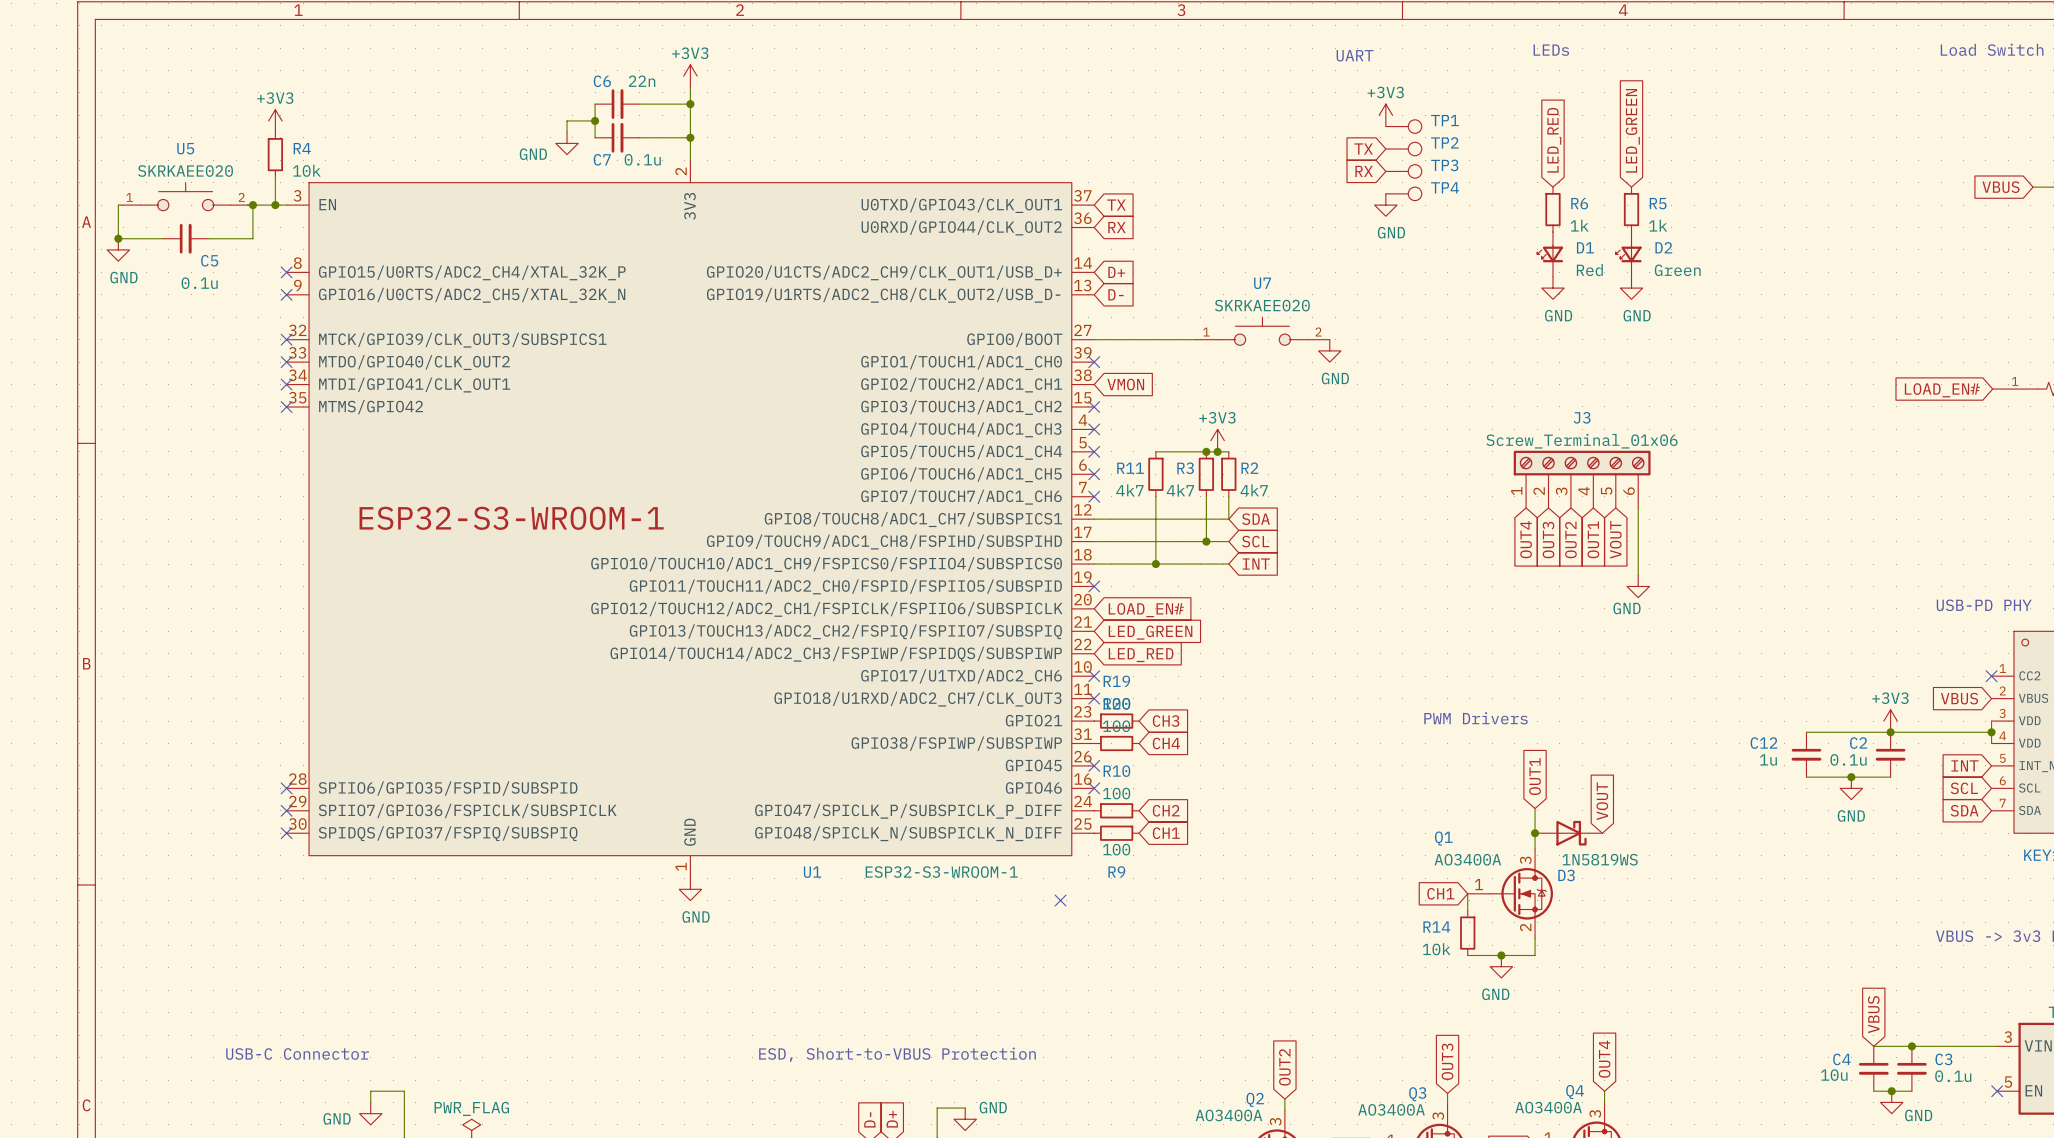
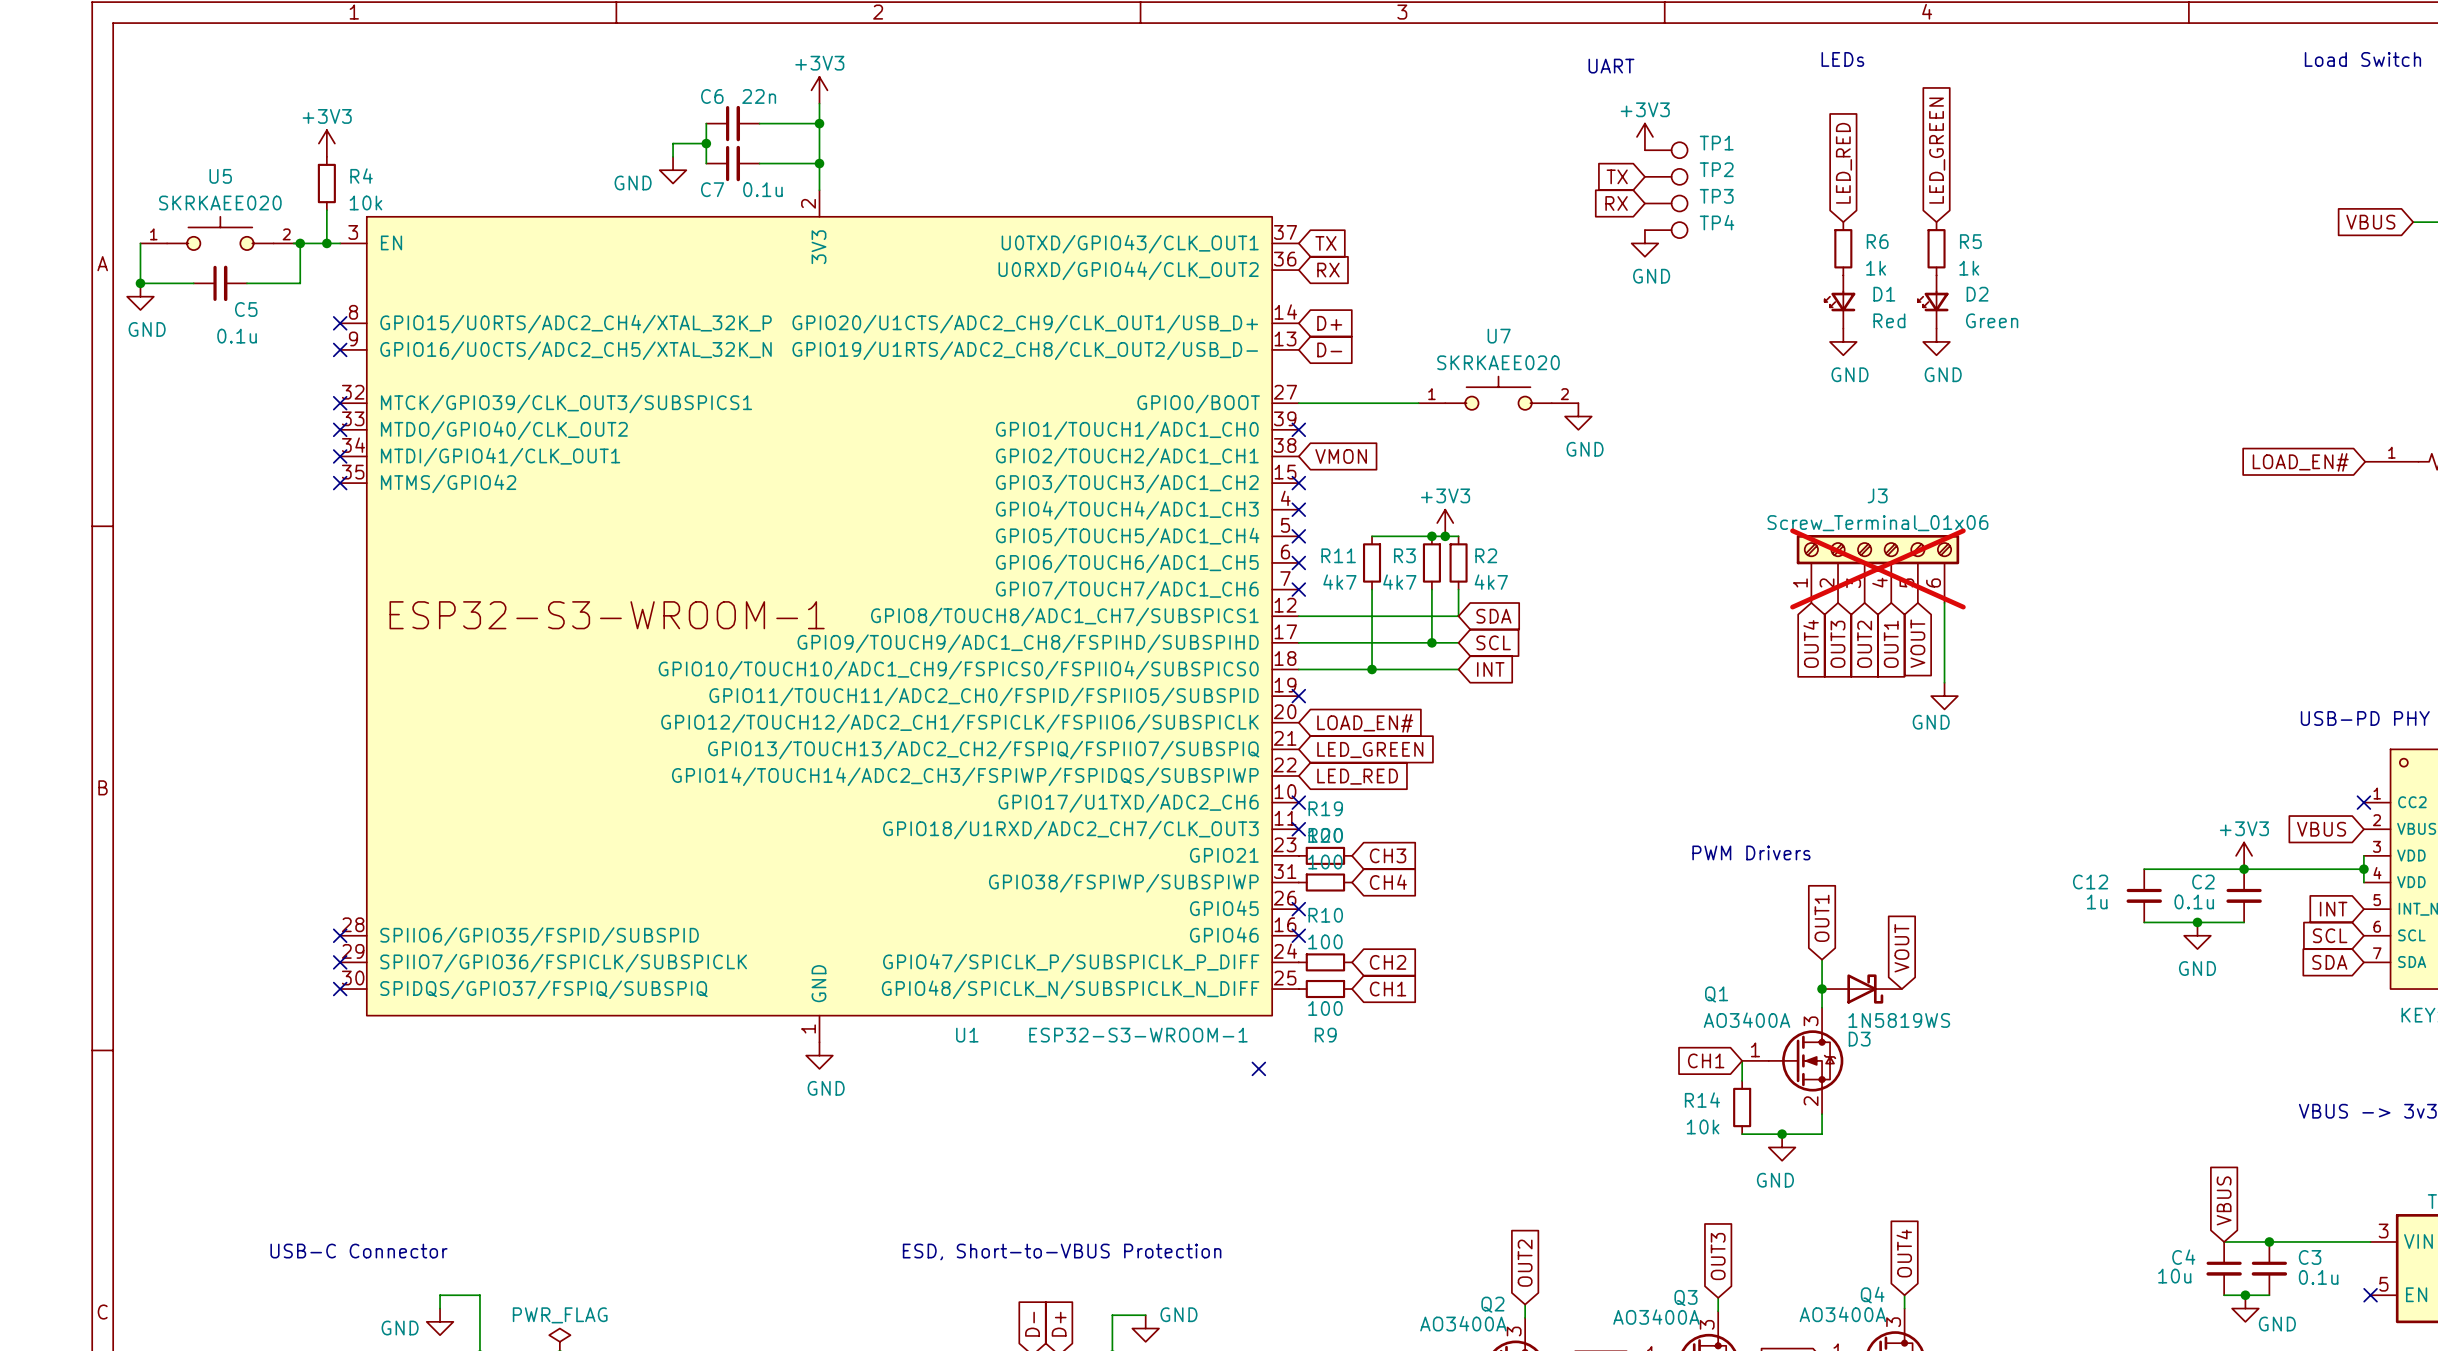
J3 do-not-place cross: none -> (1877, 568)

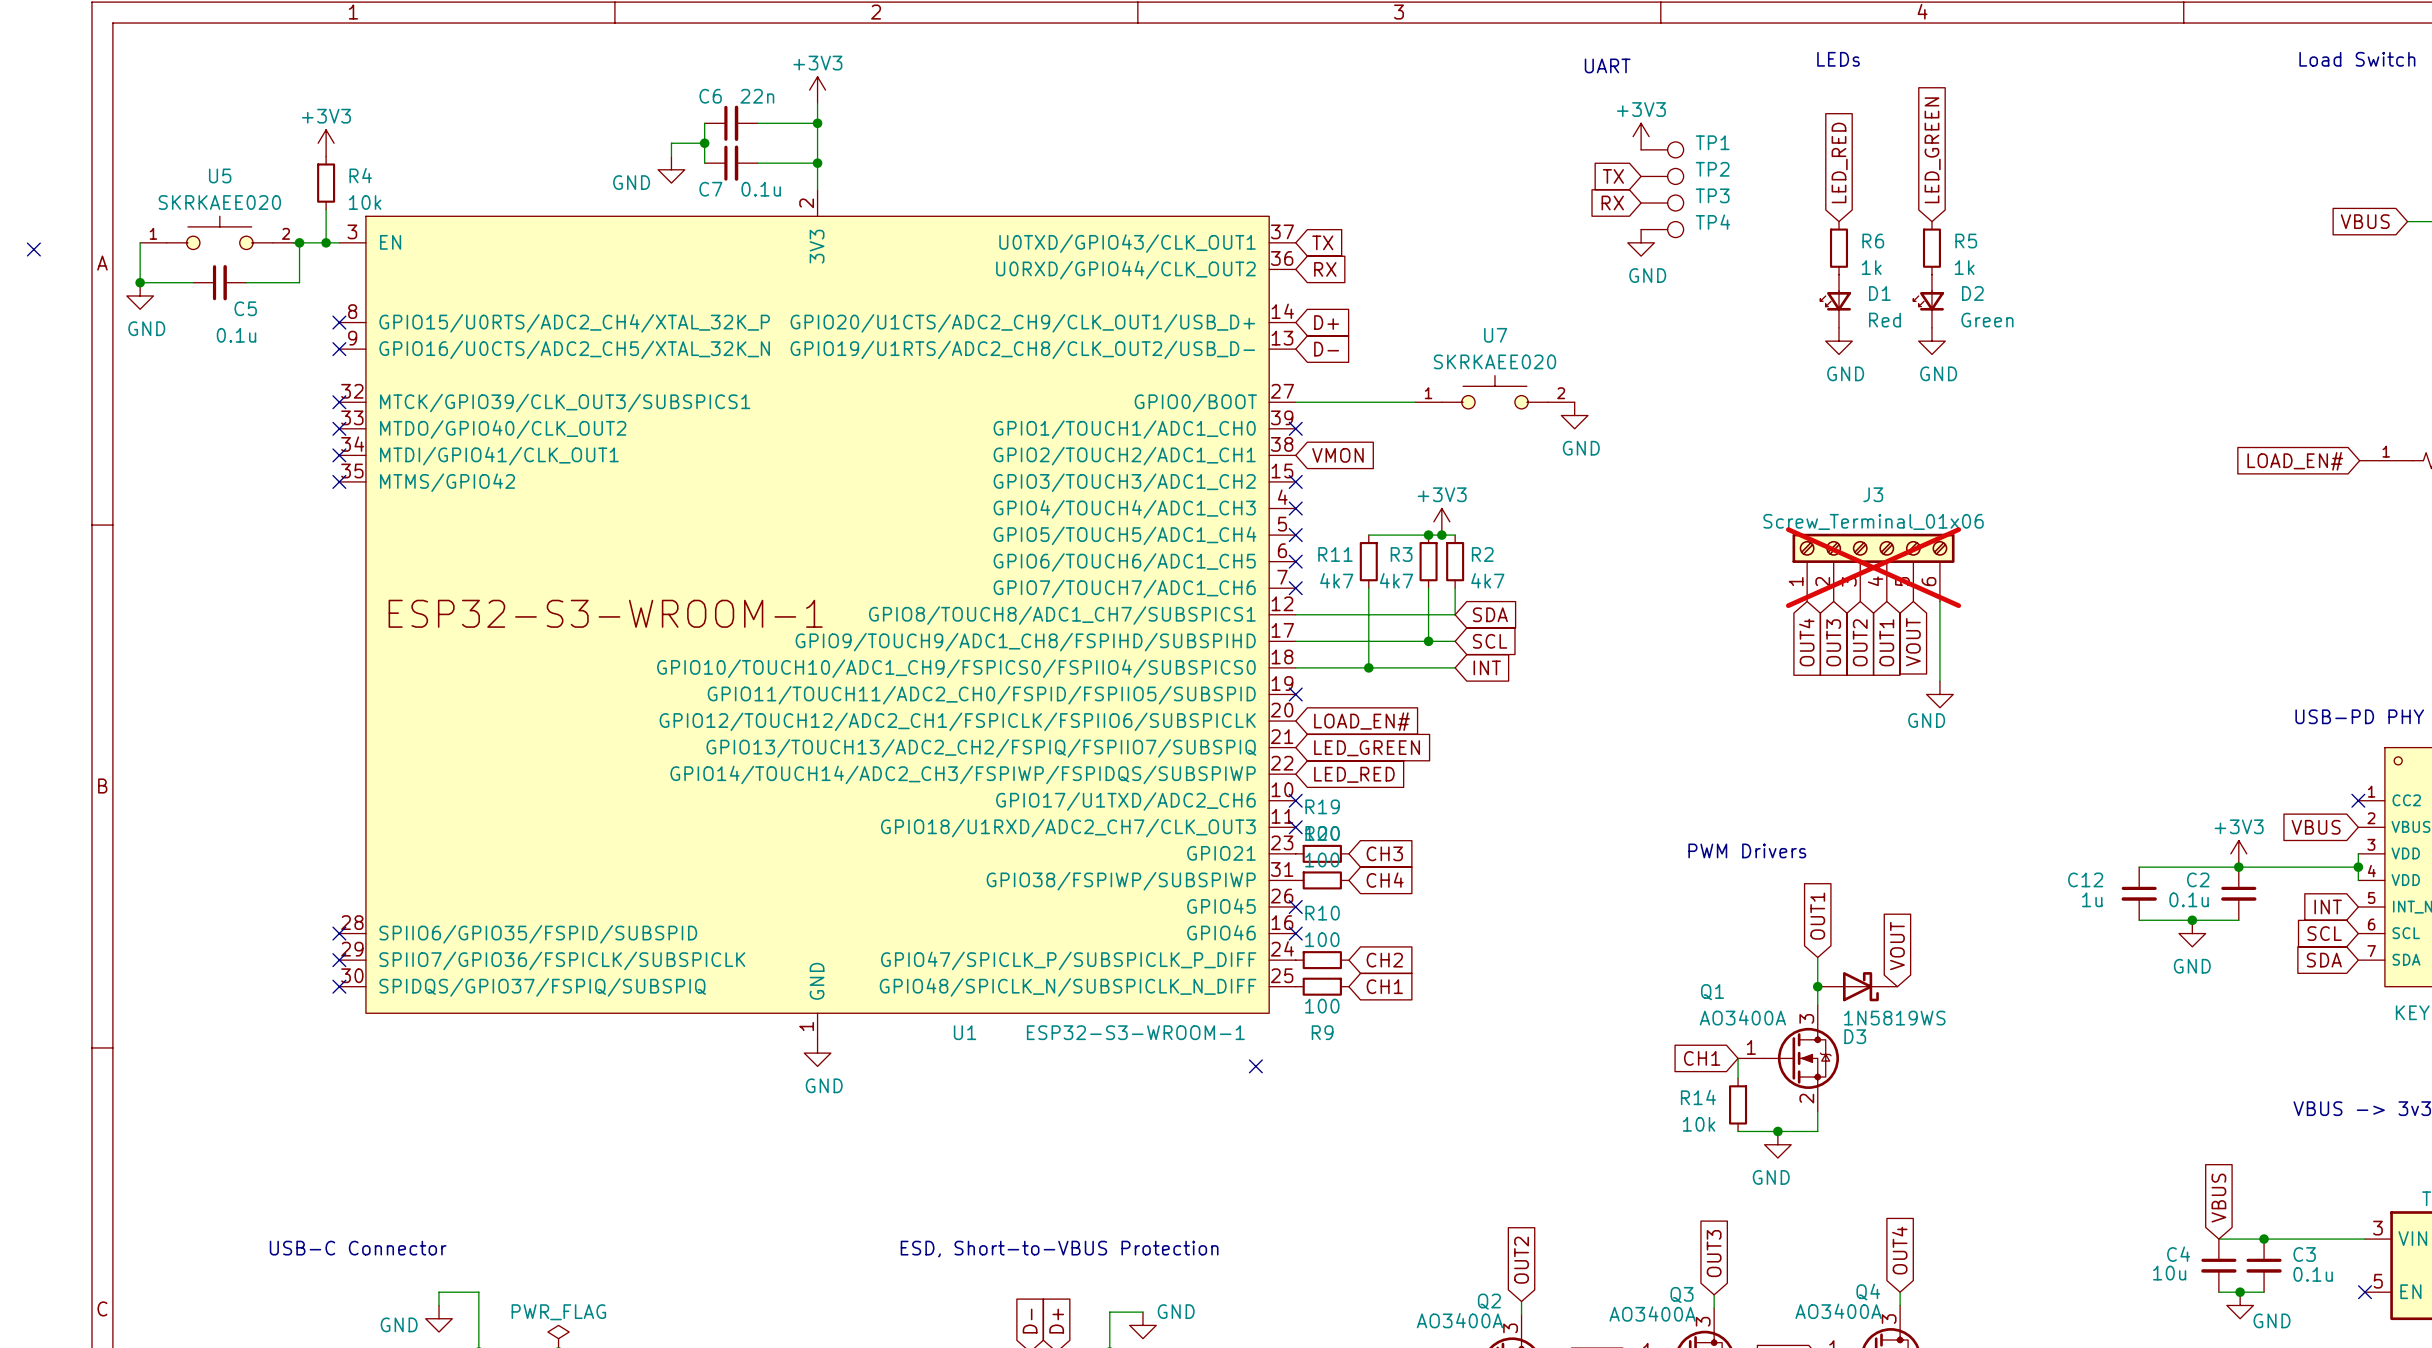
no-connect mark: none -> (33, 249)

